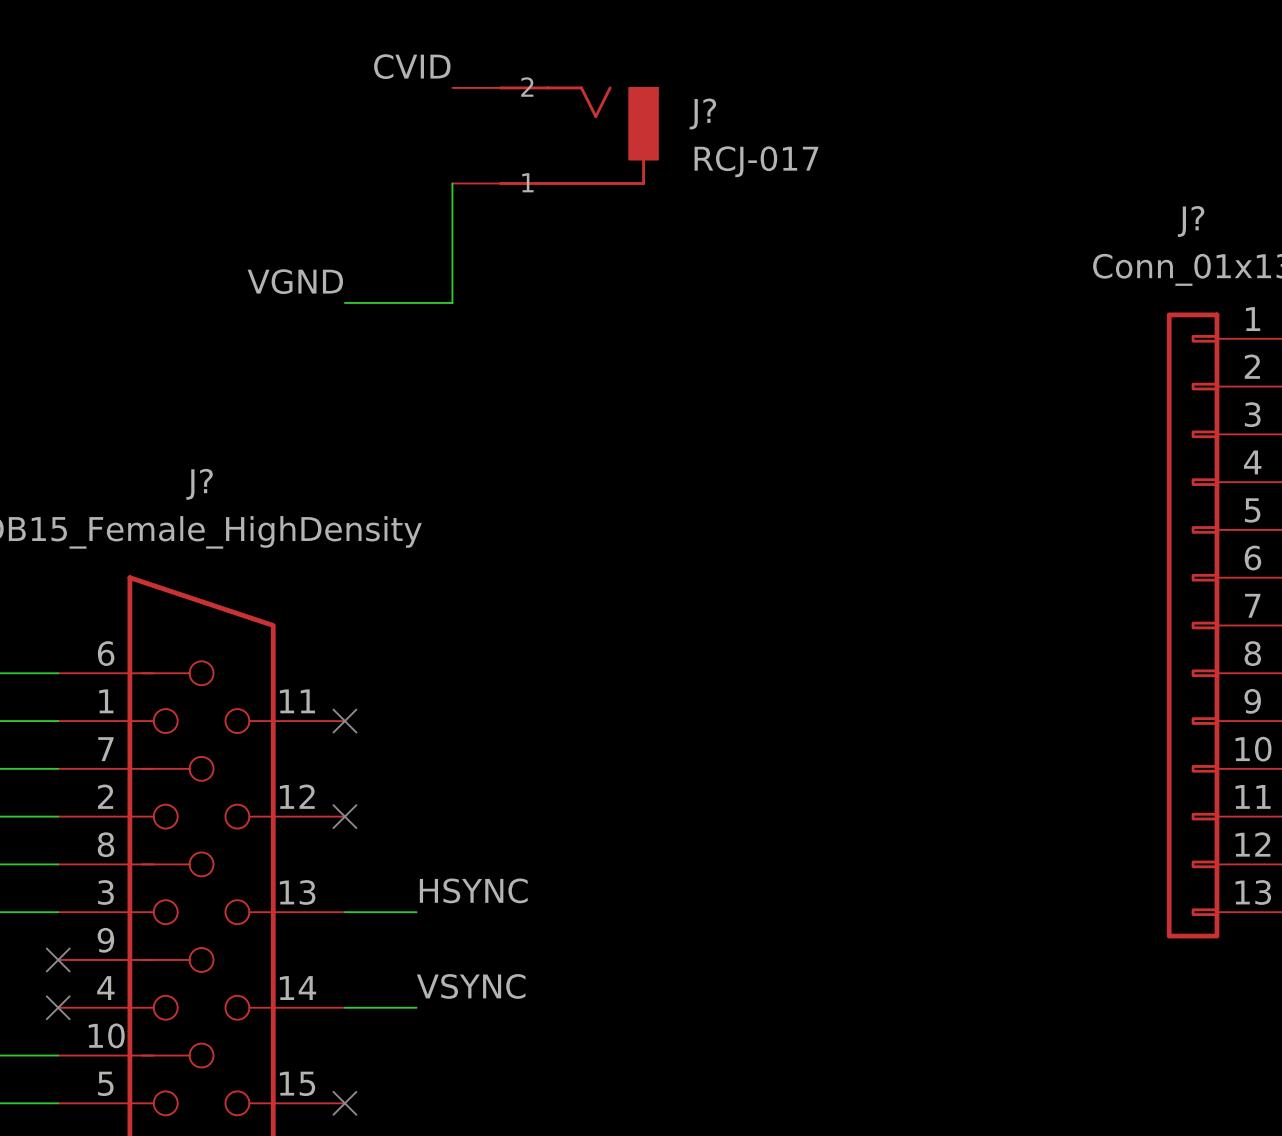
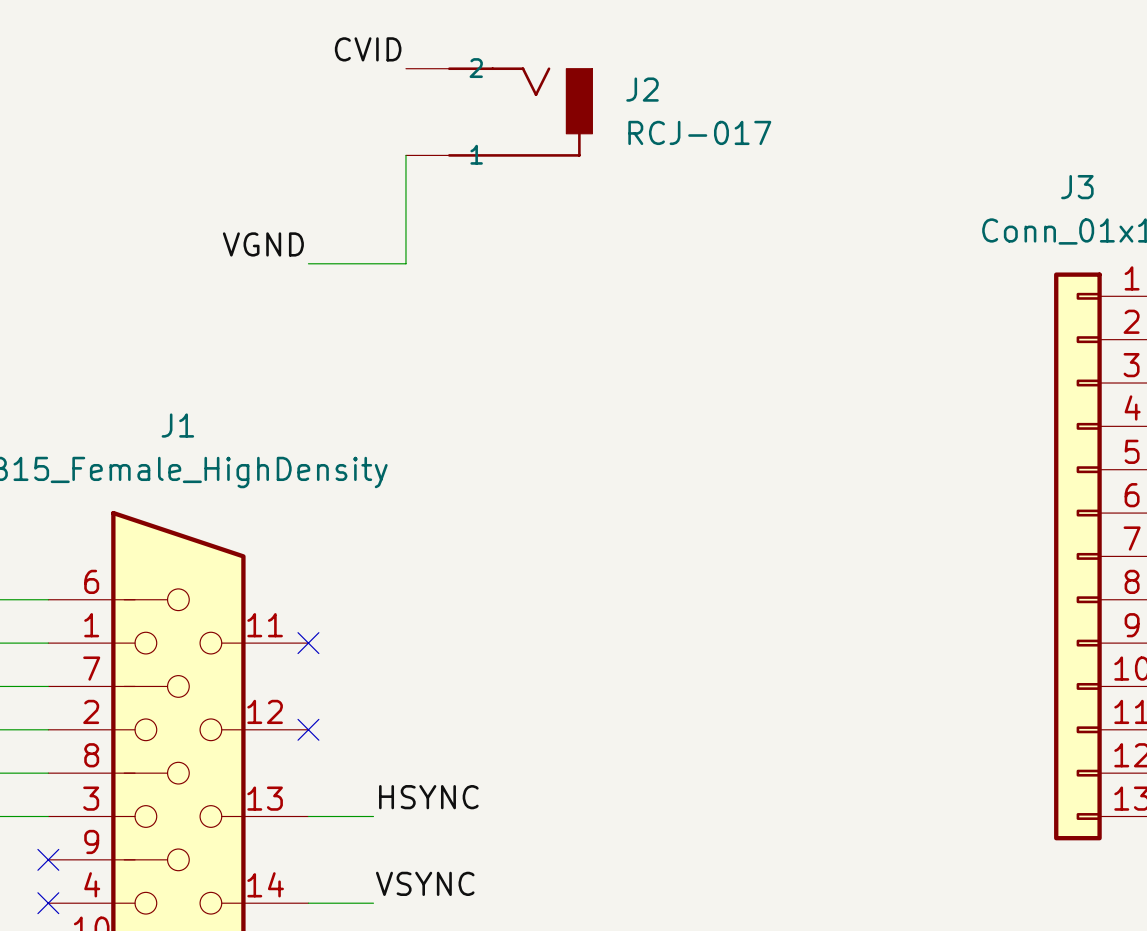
J? name: J? (702, 113) -> J2 (642, 89)
J? name: J? (1191, 221) -> J3 (1077, 187)
J? name: J? (199, 484) -> J1 (177, 425)

